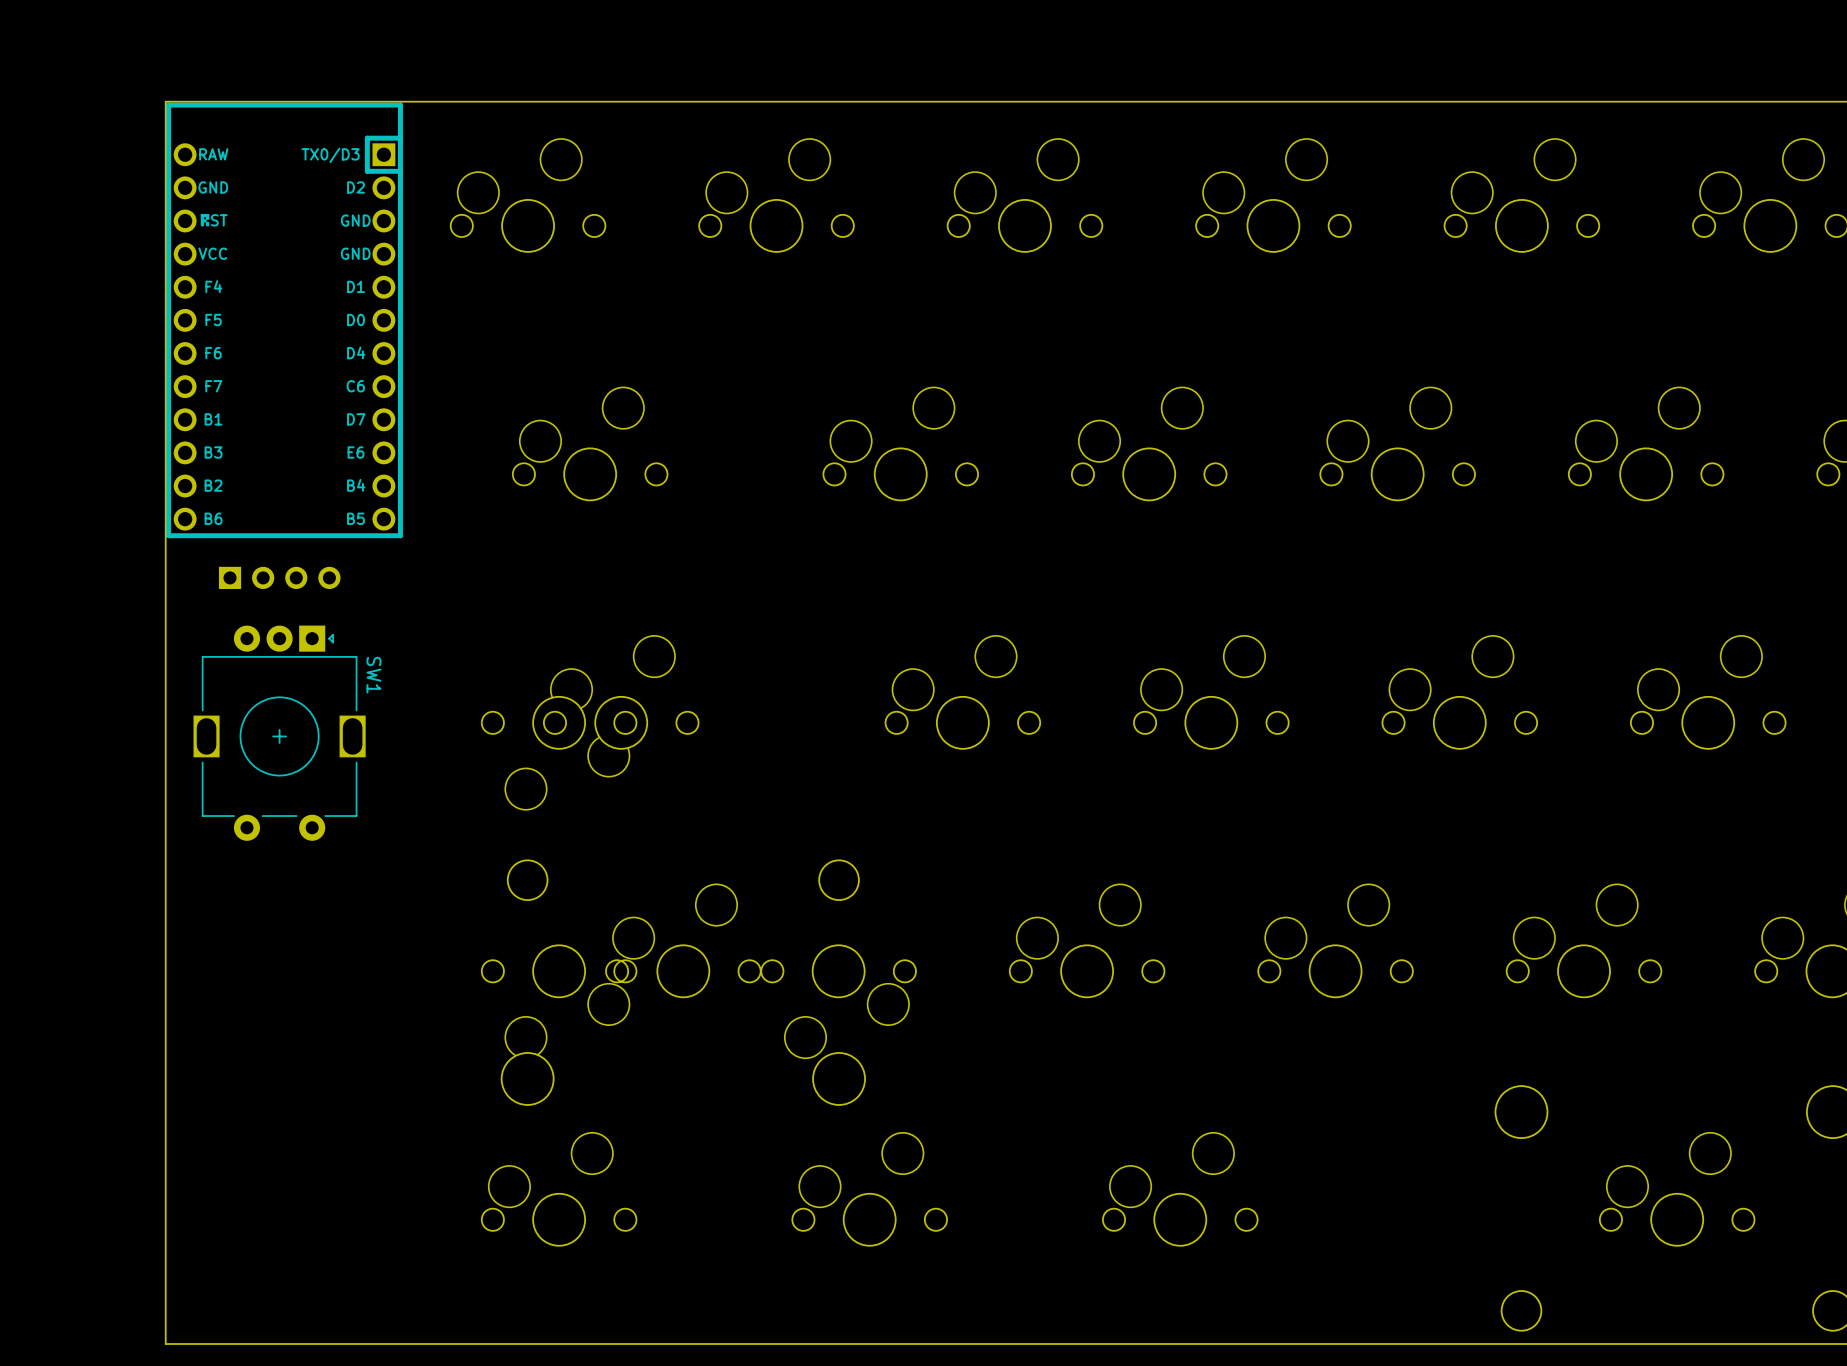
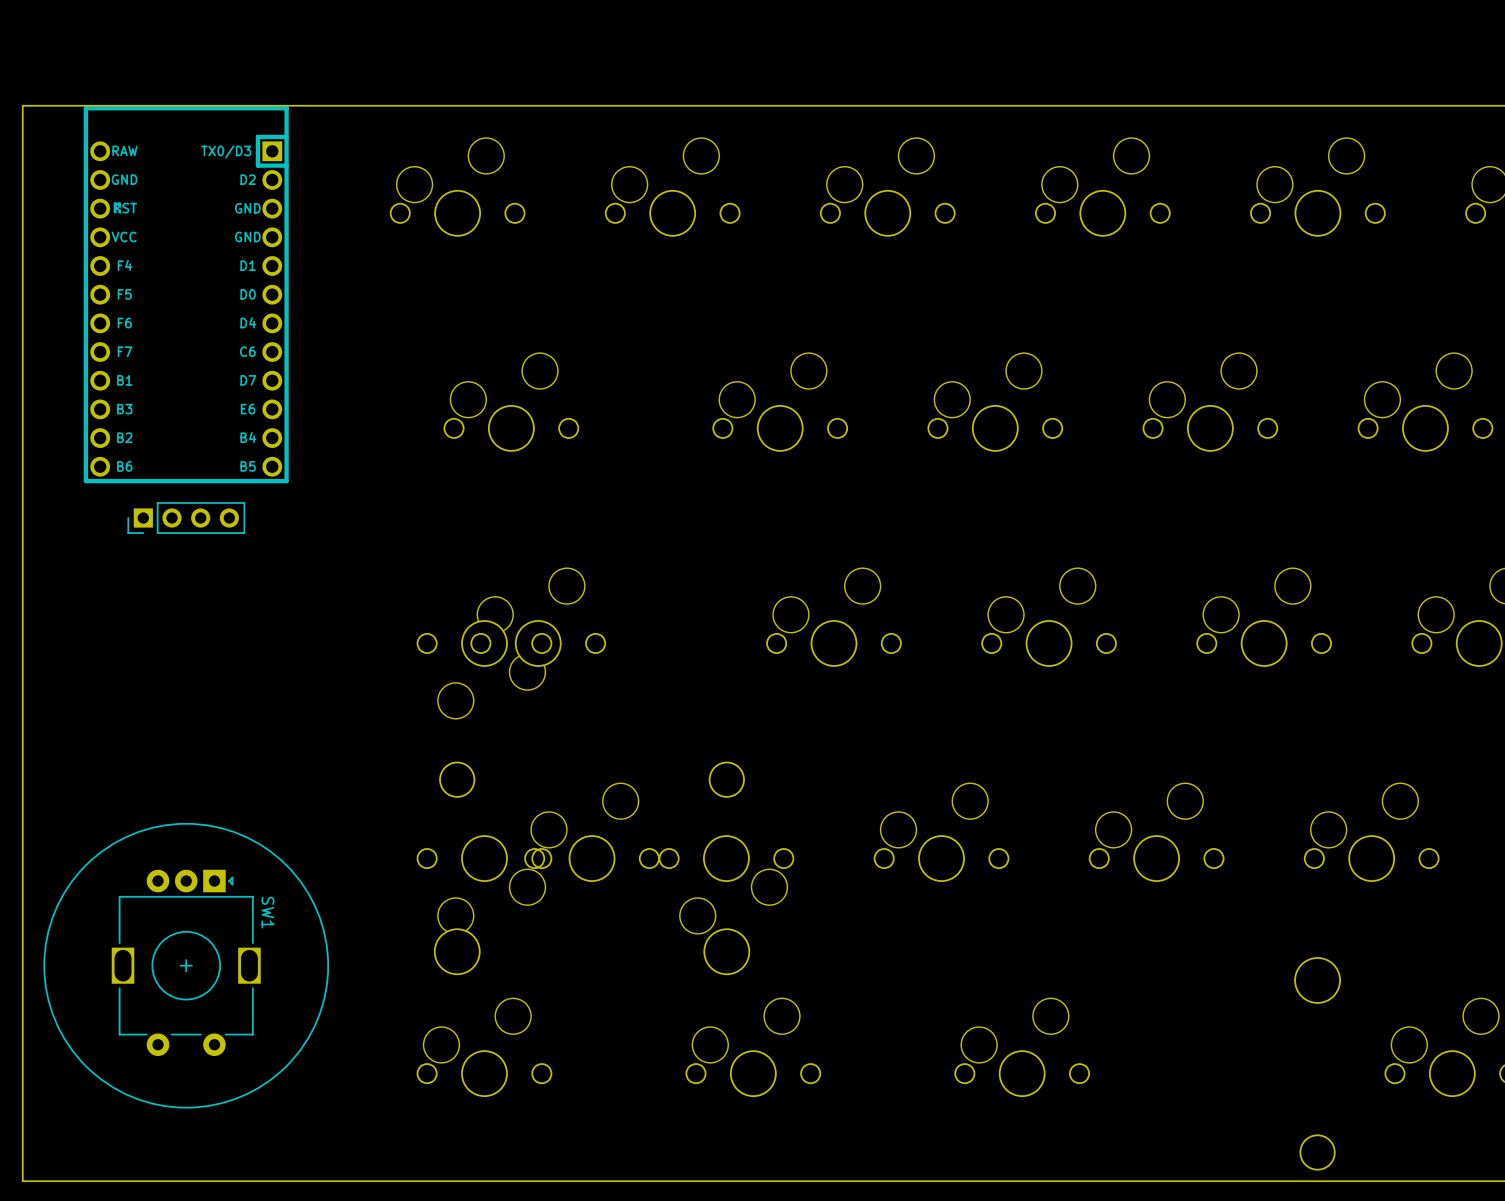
board edge: (165, 101) (165, 1343) -> (143, 105) (22, 105) (22, 1181) (143, 1181)
part position: (284, 320) -> (186, 294)
part side: top (279, 577) -> bottom (186, 518)
SW1 position: (279, 733) -> (186, 962)
drawing: none -> [43, 822, 330, 1109]

